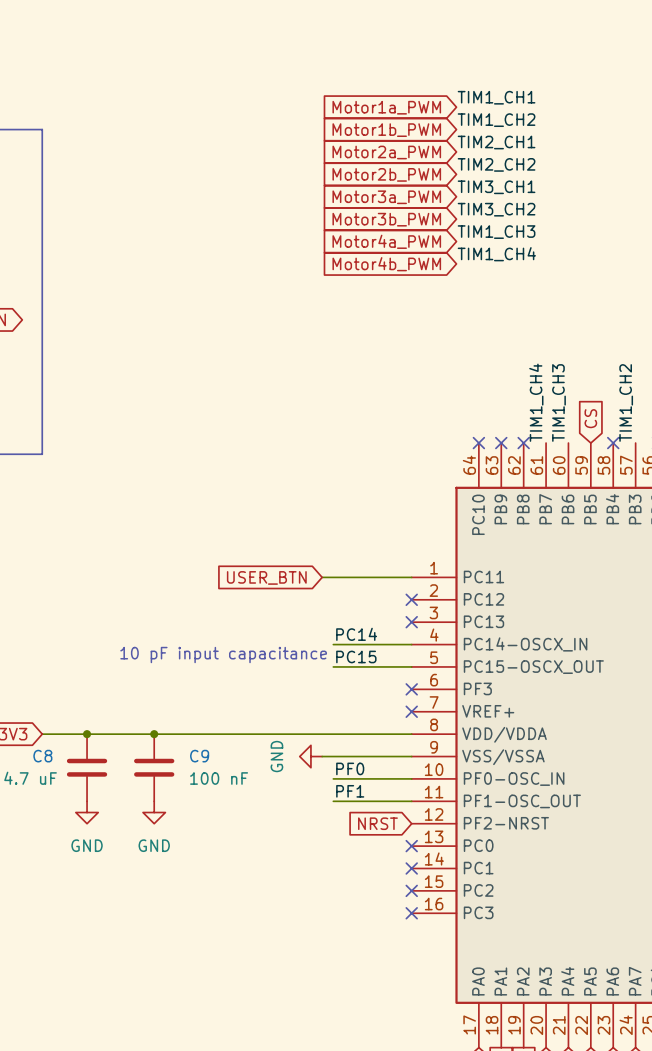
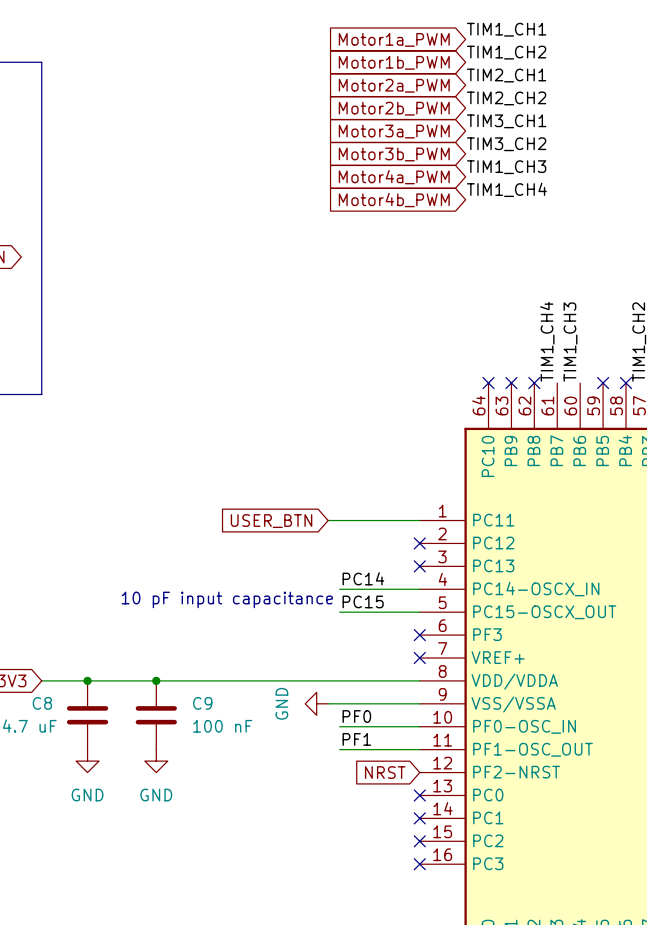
global label: CS (590, 418) -> none
no-connect mark: none -> (603, 383)

